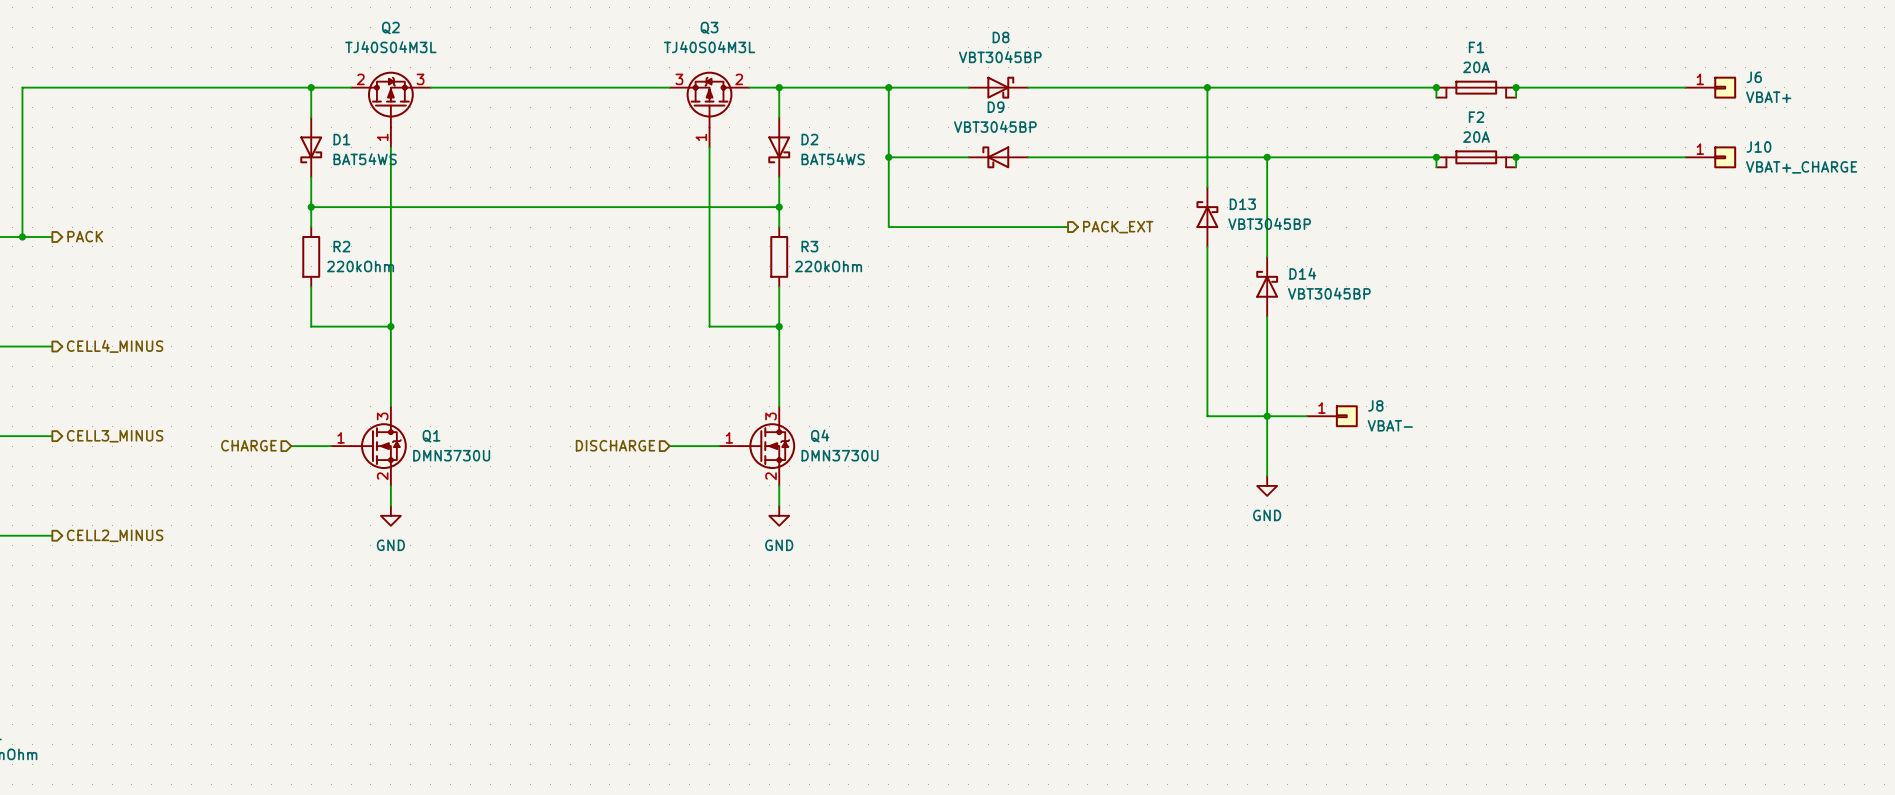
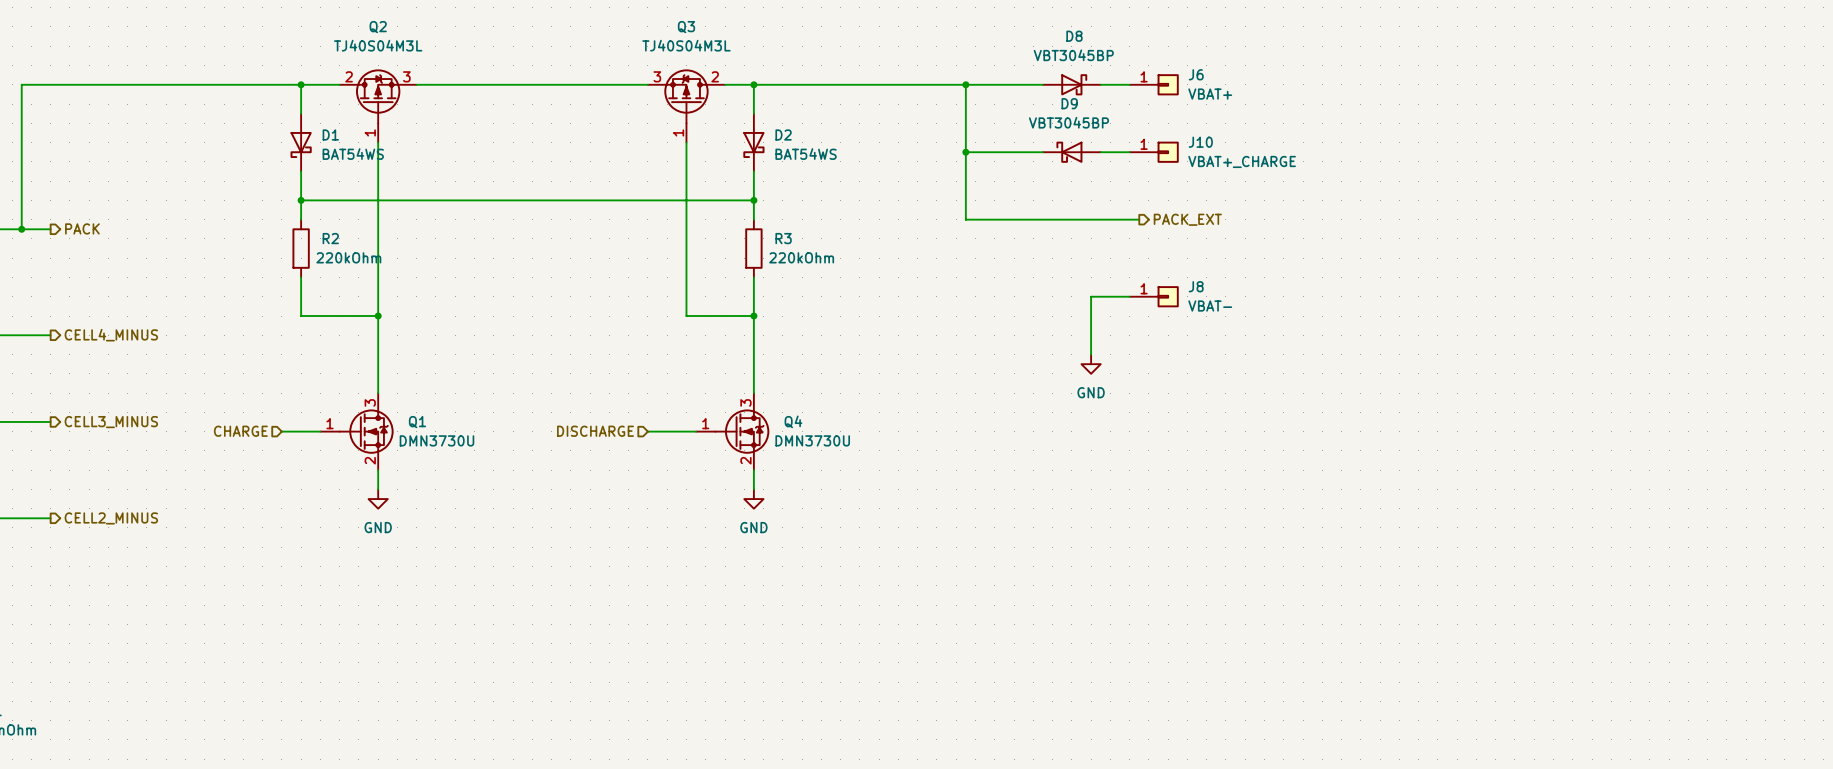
wire: (888, 87) (888, 227) (998, 227) -> (965, 84) (965, 219)
junction: (888, 87) -> none
junction: none -> (965, 84)
D8 position: (998, 87) -> (1071, 84)
wire: (1167, 87) (1436, 87) (1436, 97) -> none
wire: (1207, 87) (1207, 187) -> none
junction: (1207, 87) -> none
junction: (1436, 87) -> none
junction: (1516, 87) -> none
wire: (1685, 87) (1516, 87) (1516, 97) -> none
J6 position: (1710, 87) -> (1154, 84)
F1: 20A (1476, 89) -> none
wire: (888, 157) (968, 157) -> none
junction: (888, 157) -> none
junction: none -> (965, 152)
D9 position: (998, 157) -> (1071, 152)
wire: (1167, 157) (1436, 157) (1436, 167) -> none
wire: (1267, 157) (1267, 256) -> none
junction: (1267, 157) -> none
junction: (1436, 157) -> none
junction: (1516, 157) -> none
wire: (1685, 157) (1516, 157) (1516, 167) -> none
J10 position: (1710, 157) -> (1154, 152)
F2: 20A (1476, 158) -> none
D13: VBT3045BP (1207, 217) -> none
wire: none -> (1033, 219) (1139, 219)
hierarchical label position: PACK_EXT (1118, 227) -> PACK_EXT (1187, 219)
wire: (1207, 246) (1207, 416) (1306, 416) -> none
D14: VBT3045BP (1267, 286) -> none
wire: none -> (1129, 296) (1091, 296) (1091, 354)
wire: (1267, 316) (1267, 475) -> none
junction: (1267, 416) -> none
J8 position: (1332, 416) -> (1154, 296)
power symbol position: GND (1267, 485) -> GND (1091, 364)

